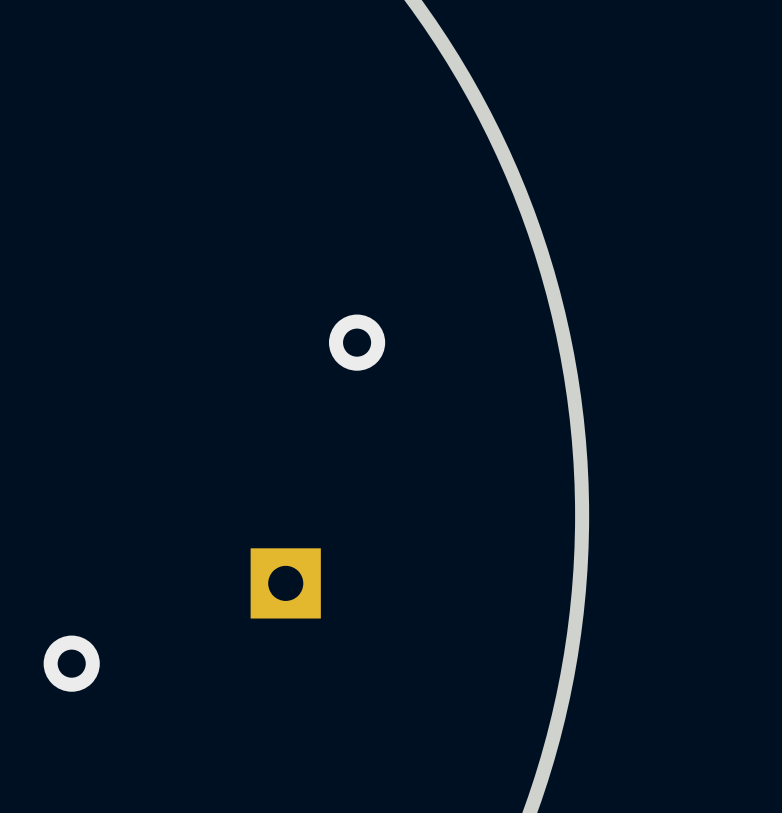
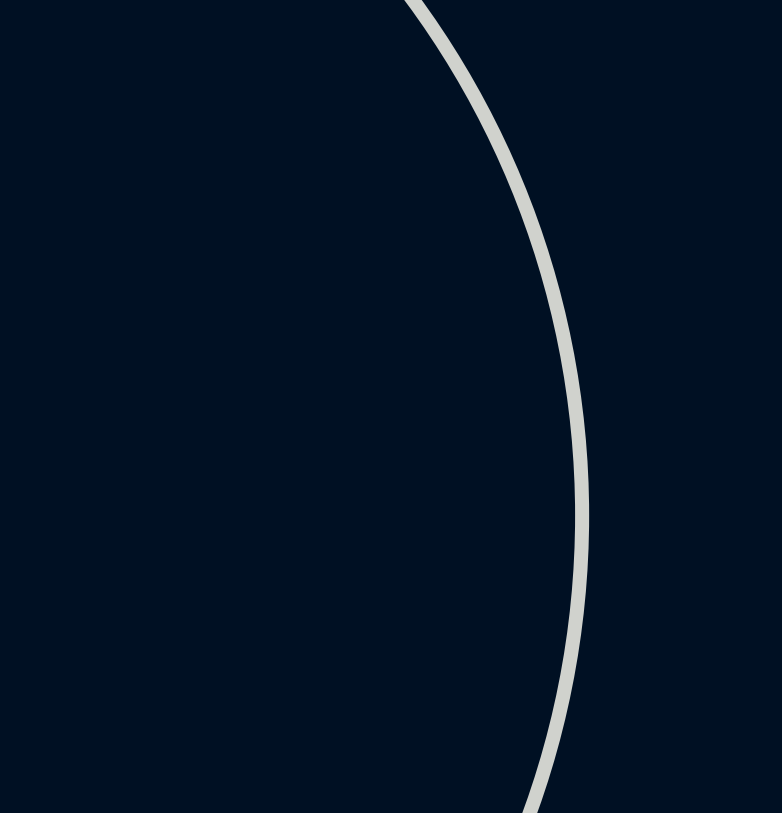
via: (357, 342) -> none
part: (285, 583) -> none
via: (71, 663) -> none

